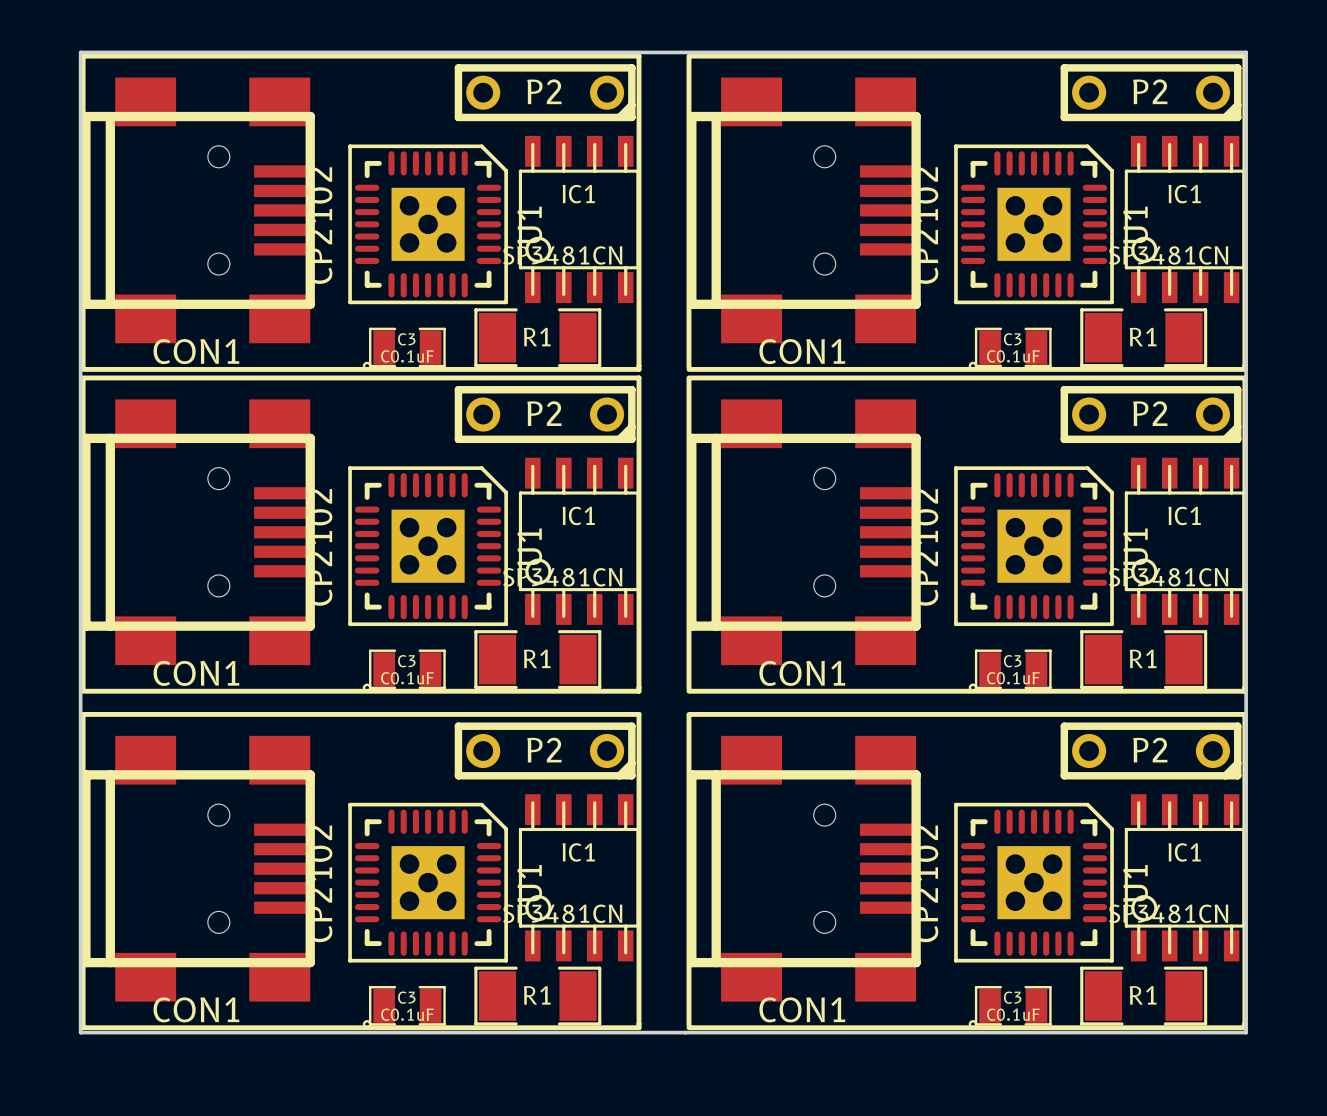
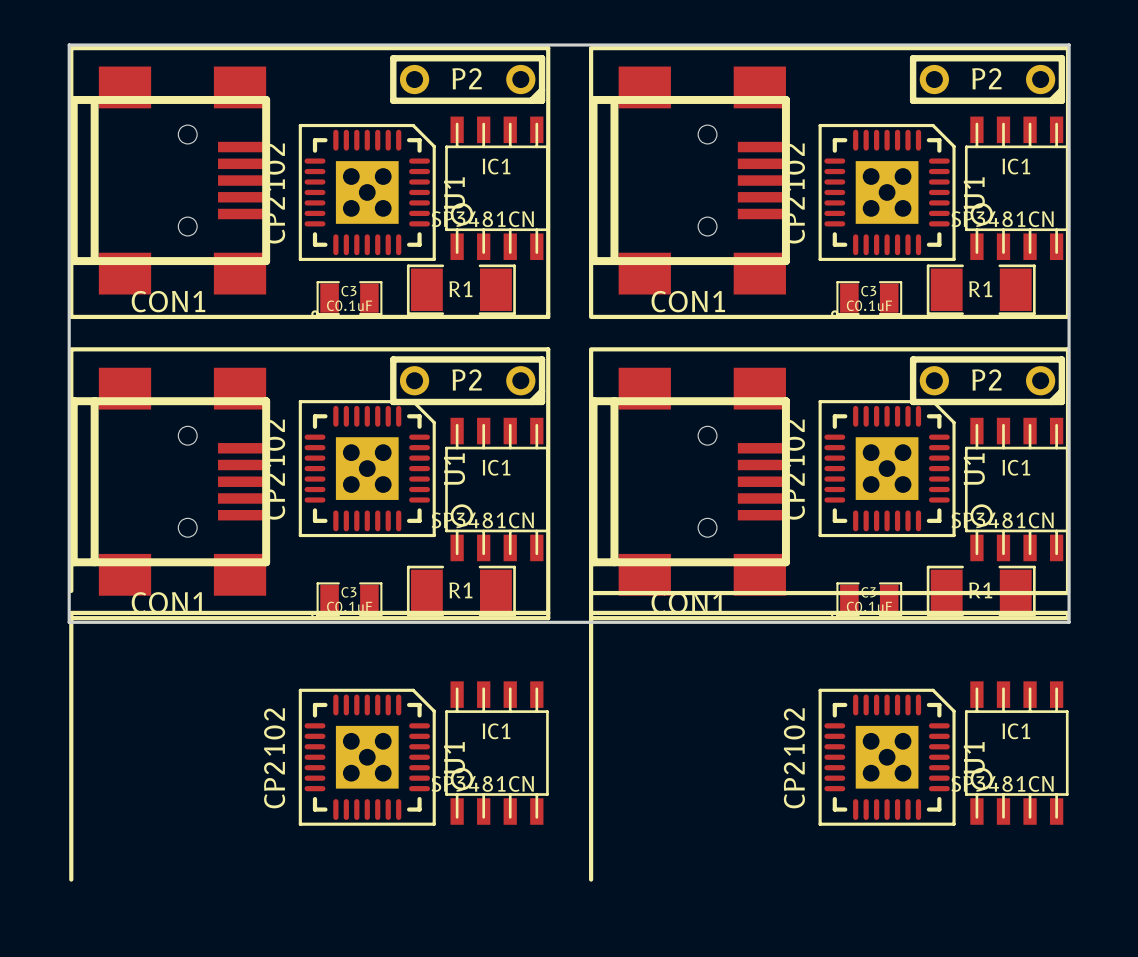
line: (83, 377) (639, 377) (639, 407) -> (71, 349) (548, 349)
line: (688, 377) (1244, 377) (1244, 407) -> (591, 349) (1068, 349)
line: (83, 379) (83, 408) -> none
line: (688, 379) (688, 408) -> none
P2 position: (545, 414) -> (467, 380)
P2 position: (1151, 414) -> (987, 380)
CON1 position: (198, 532) -> (169, 481)
CON1 position: (803, 532) -> (689, 481)
IC1 position: (579, 541) -> (496, 489)
IC1 position: (1185, 541) -> (1016, 489)
R1 position: (537, 659) -> (461, 590)
R1 position: (1143, 659) -> (981, 590)
C3 position: (404, 670) -> (346, 600)
C3 position: (1010, 670) -> (866, 600)
line: none -> (591, 590) (591, 613)
line: (83, 691) (639, 691) -> (548, 612) (548, 593)
line: (639, 720) (639, 1027) (83, 1027) -> (548, 618) (71, 618)
line: (1244, 720) (1244, 1027) (688, 1027) -> (1068, 618) (591, 618)
board edge: (80, 725) (80, 1032) (1246, 1032) (1246, 725) -> (69, 622) (1069, 622)
P2: (545, 750) -> none
P2: (1151, 750) -> none
CON1: (198, 868) -> none
CON1: (803, 868) -> none
R1: (537, 996) -> none
R1: (1143, 996) -> none
C3: C0.1uF (404, 1007) -> none
C3: C0.1uF (1010, 1007) -> none

